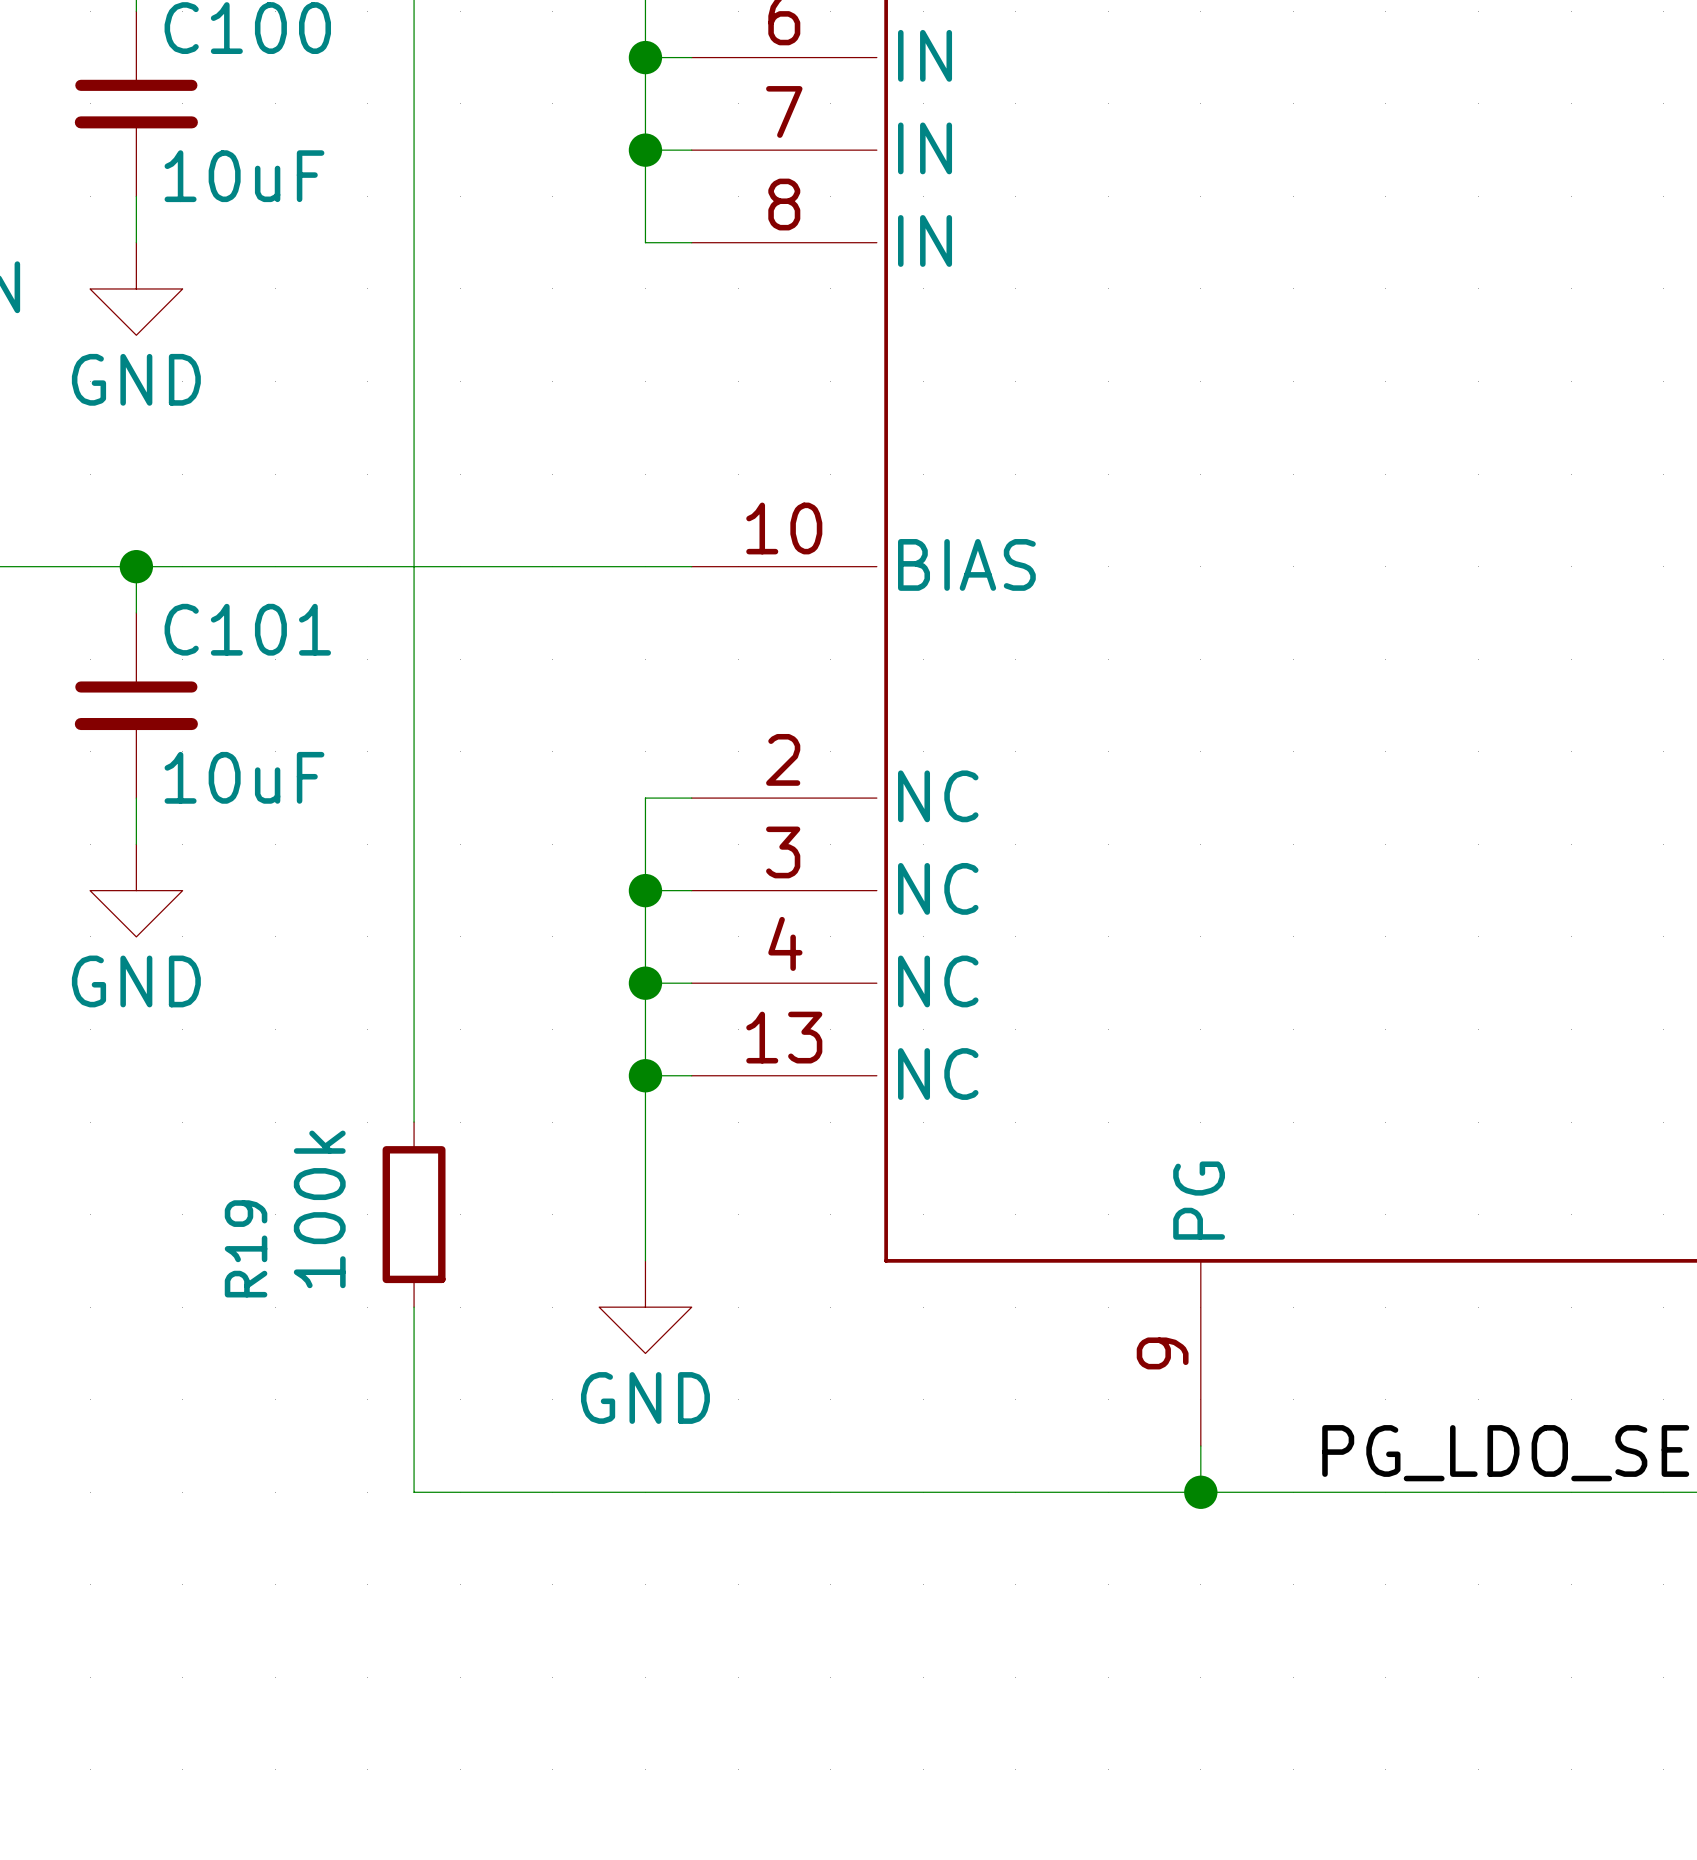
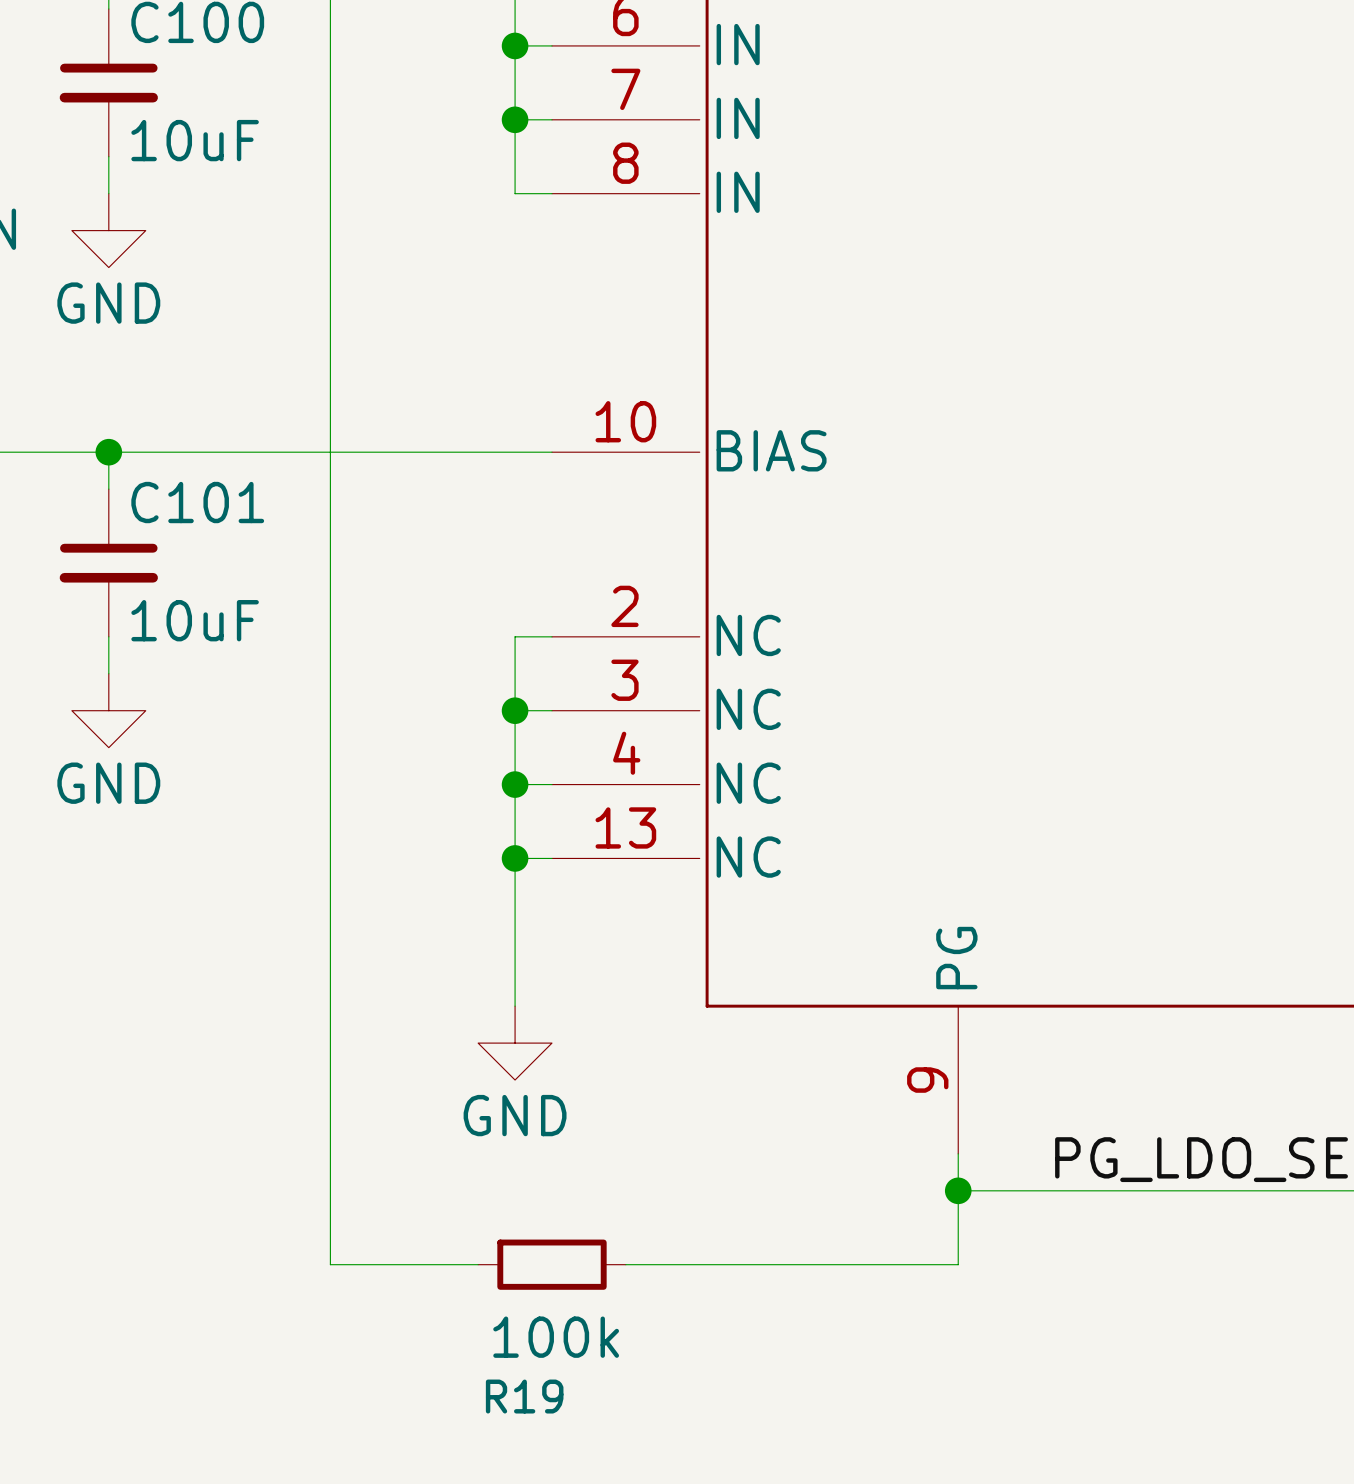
wire: none -> (330, 895) (330, 1043)
R19 value position: 100k (319, 1209) -> 100k (556, 1337)
R19 rotation: 0° (414, 1214) -> 90° clockwise (551, 1264)
R19 position: (414, 1214) -> (551, 1264)
R19 name position: R19 (246, 1248) -> R19 (524, 1396)
wire: (414, 1492) (1200, 1492) -> (625, 1264) (958, 1264) (958, 1190)
wire: none -> (330, 1190) (330, 1264) (478, 1264)

